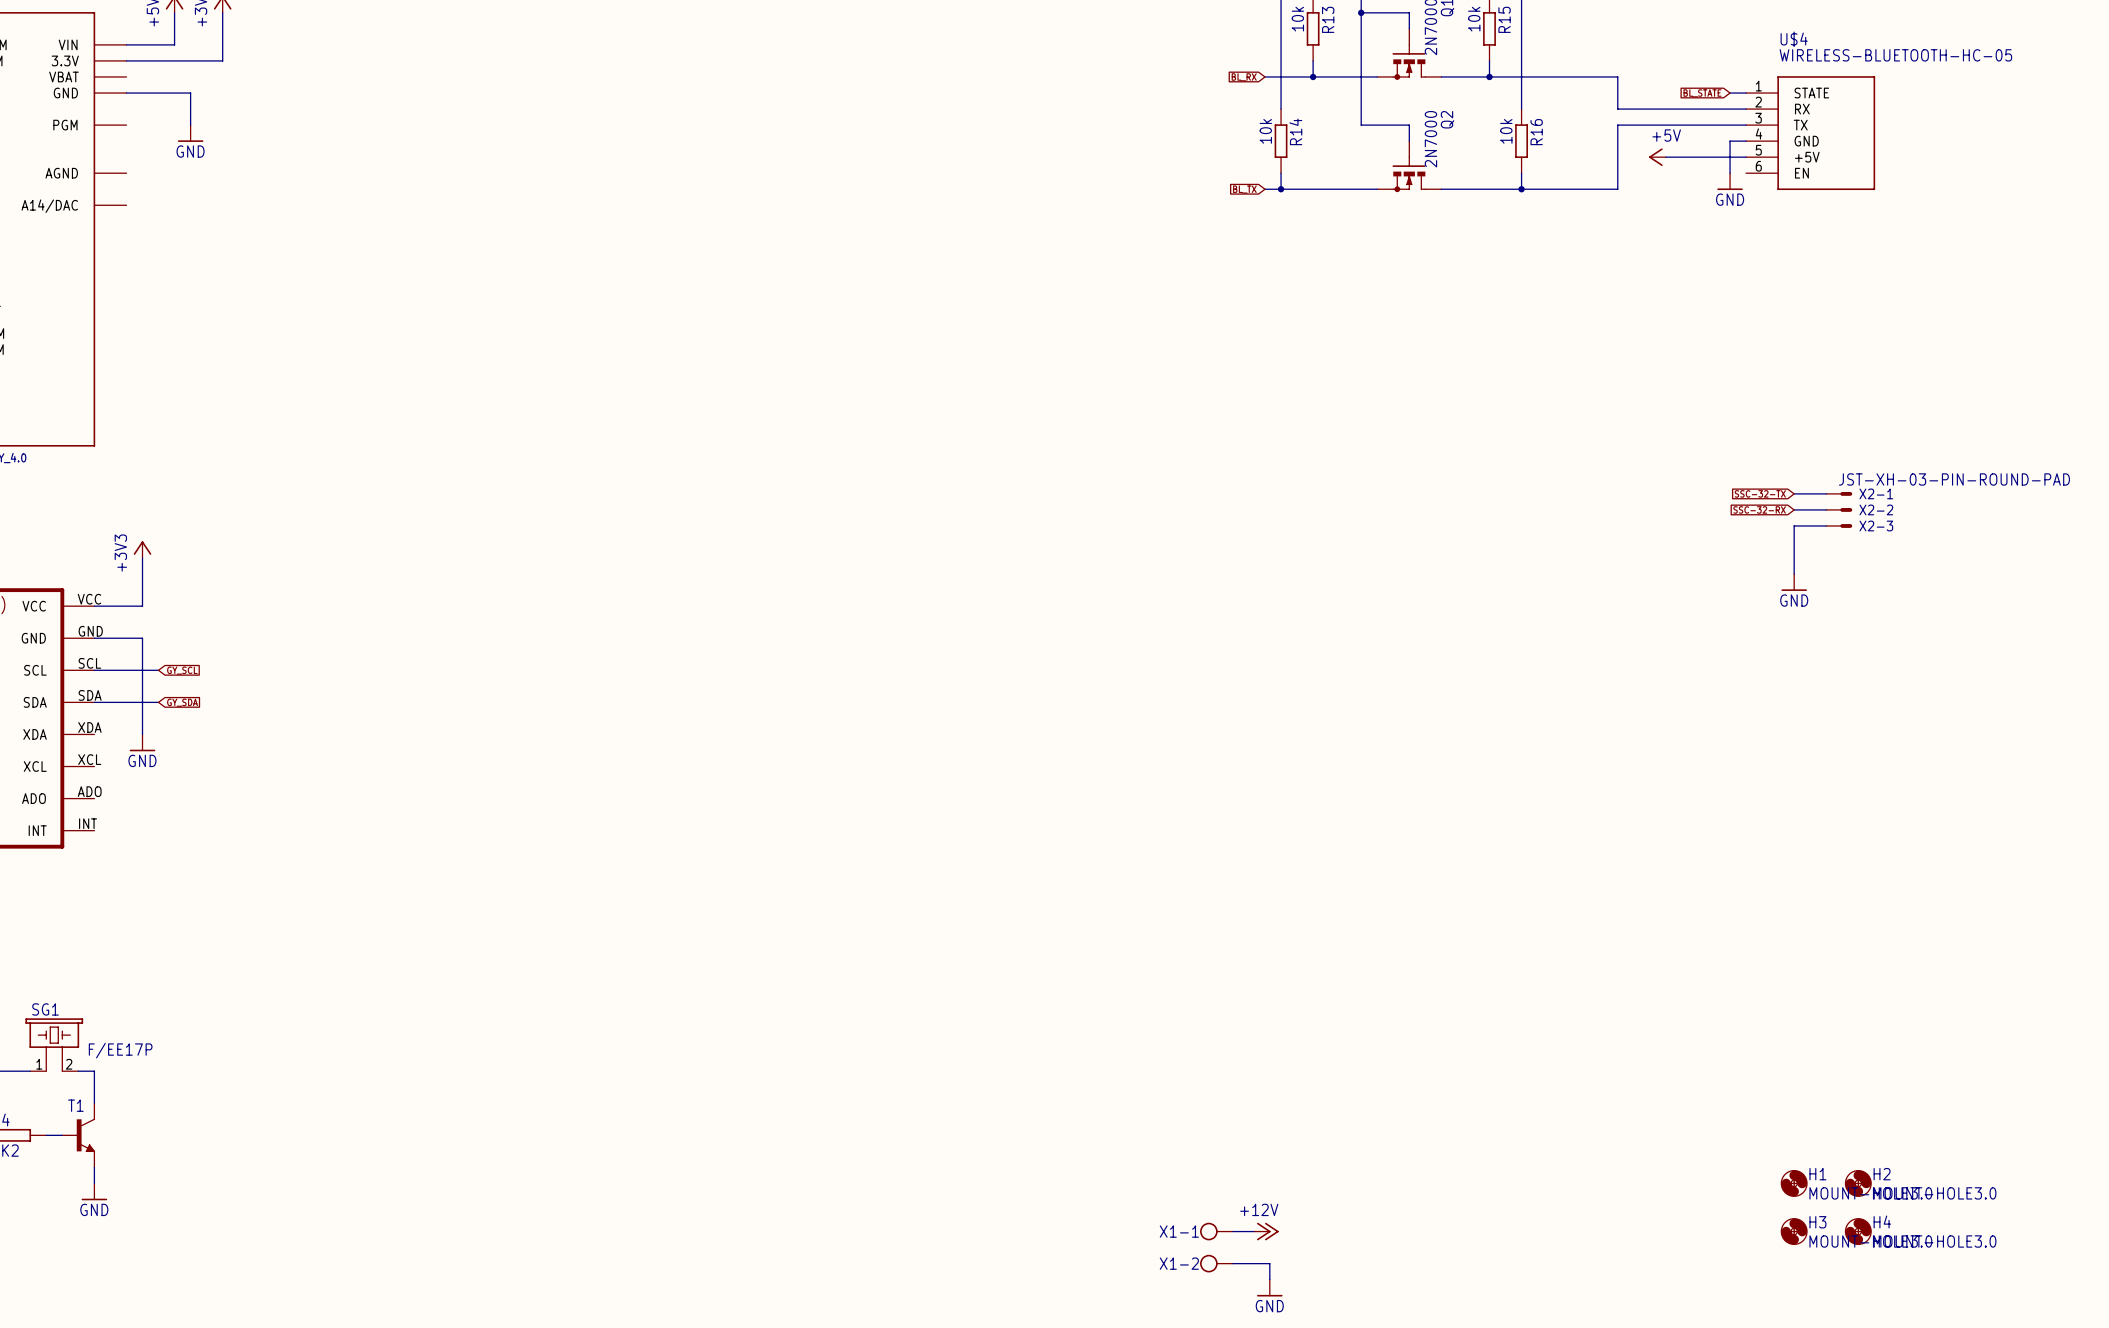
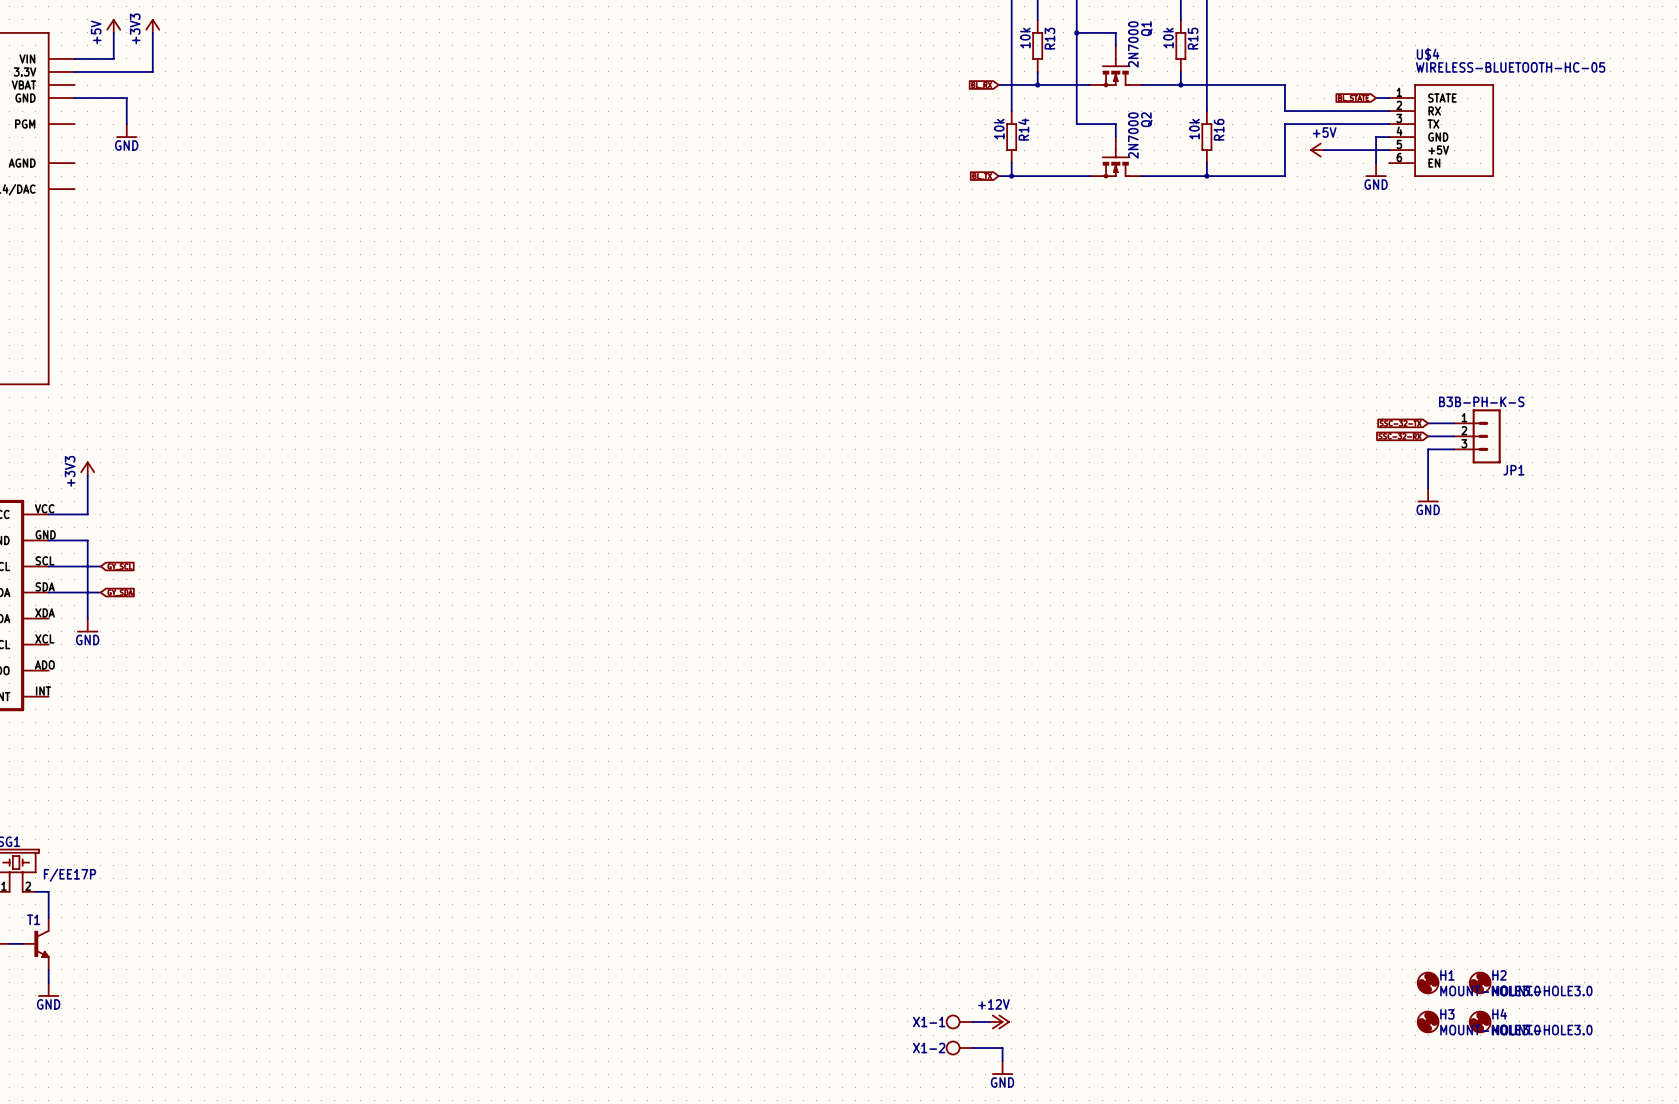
X2-1: JST-XH-03-PIN-ROUND-PAD (1839, 493) -> none
X2-2: (1839, 509) -> none
JP1: none -> B3B-PH-K-S (1477, 436)
X2-3: (1839, 525) -> none

